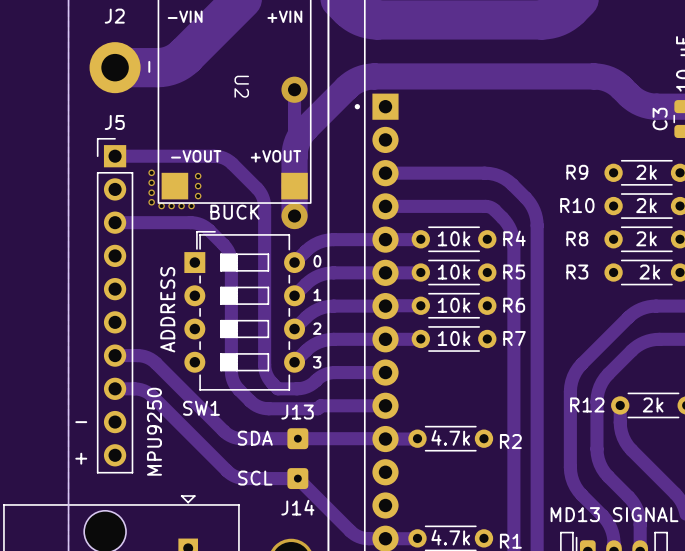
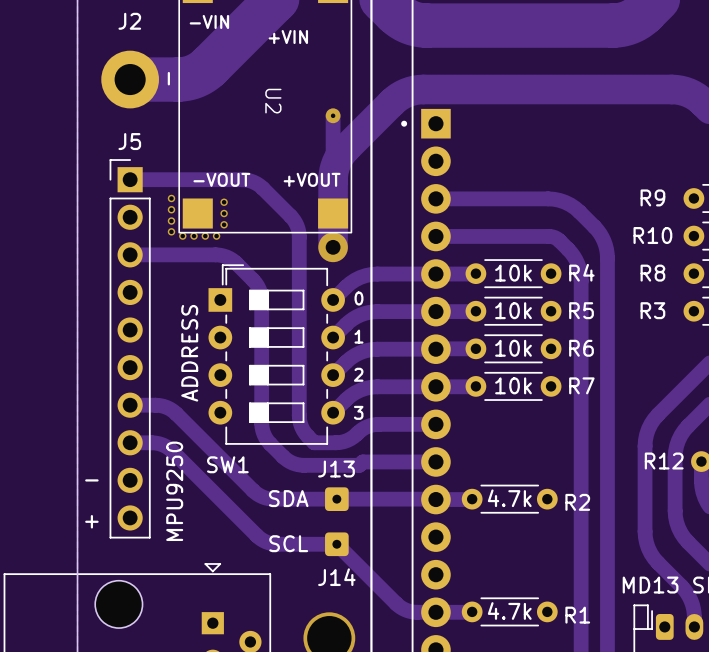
text position: +VIN (284, 16) -> +VIN (288, 37)
via size: [281, 76, 308, 103] -> [325, 108, 341, 124]
U2 value: BUCK (235, 212) -> none

